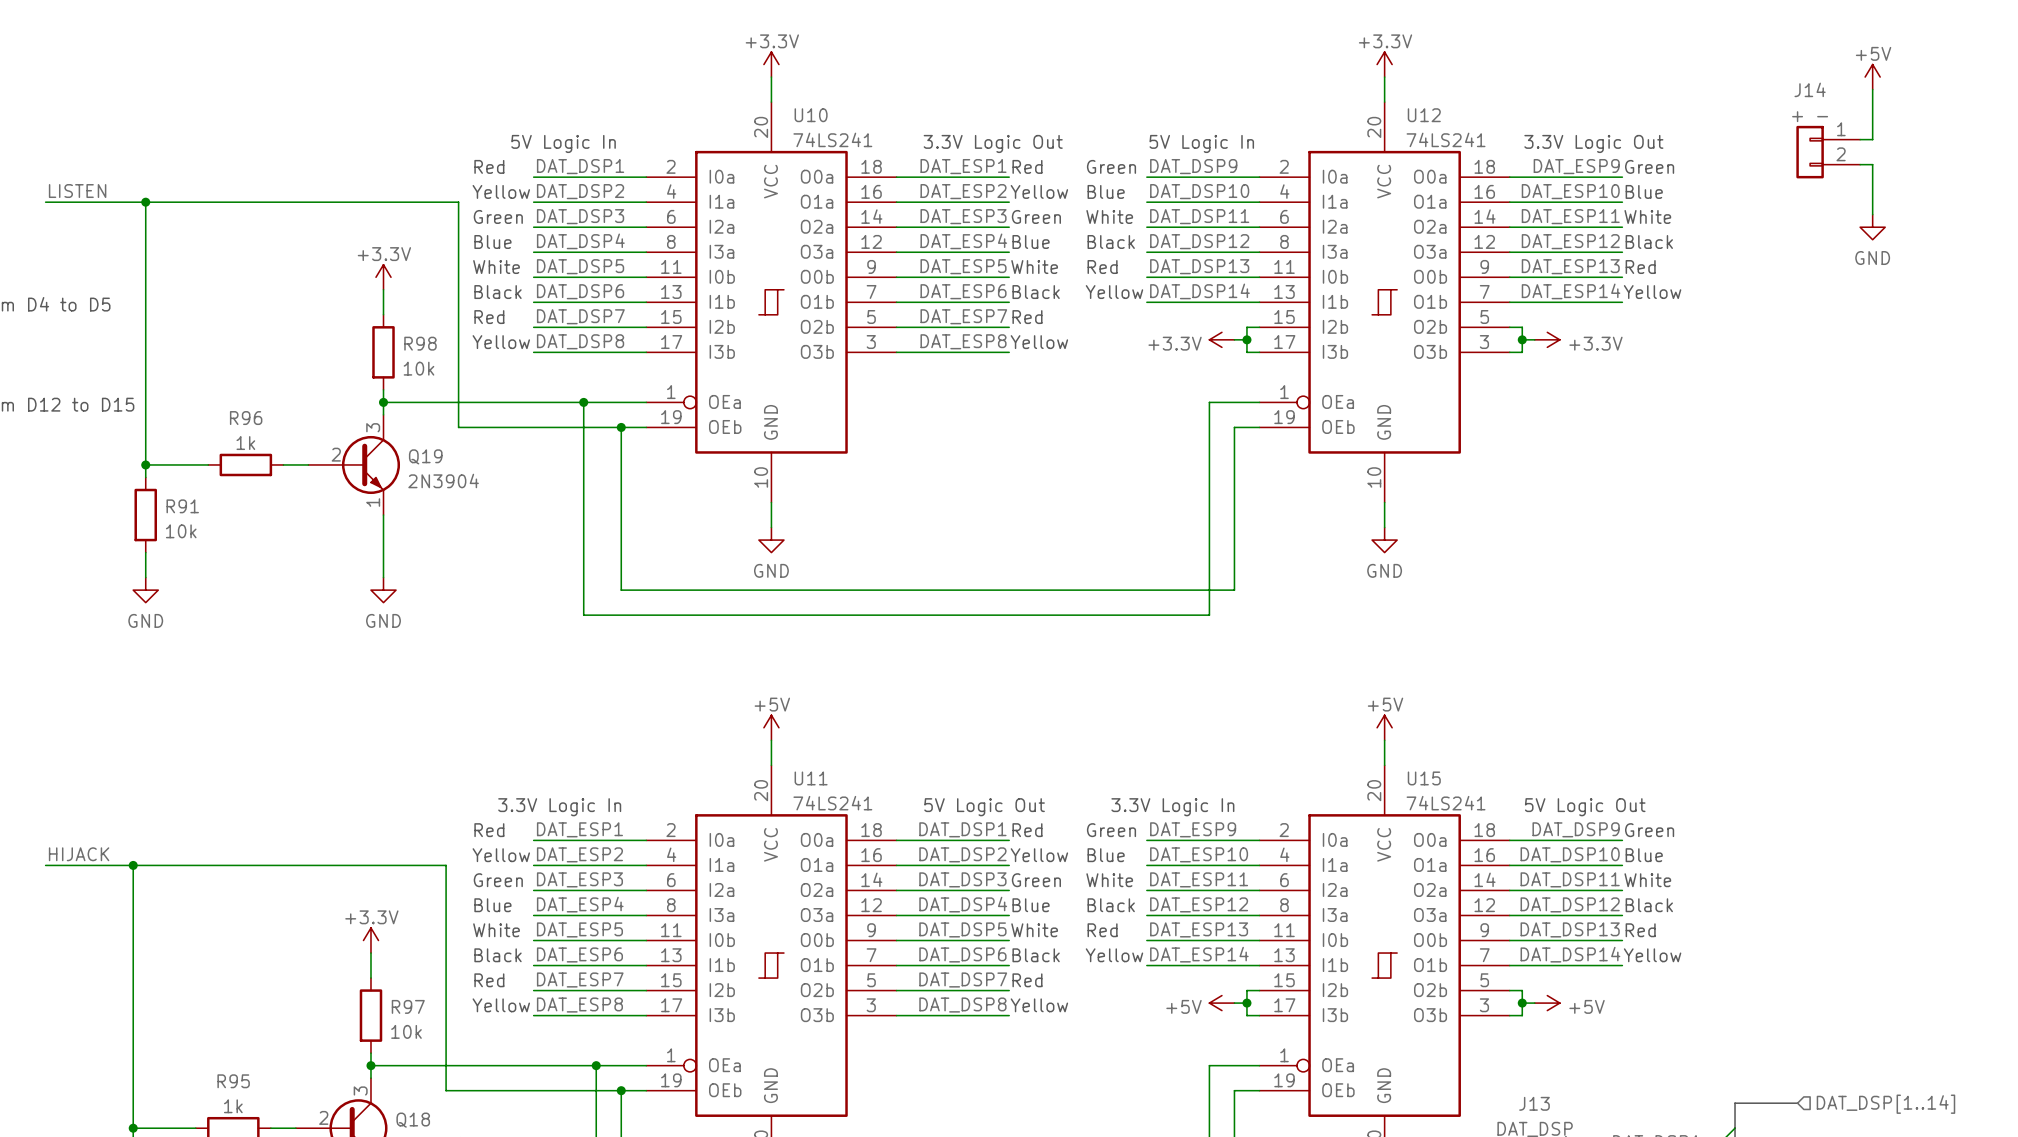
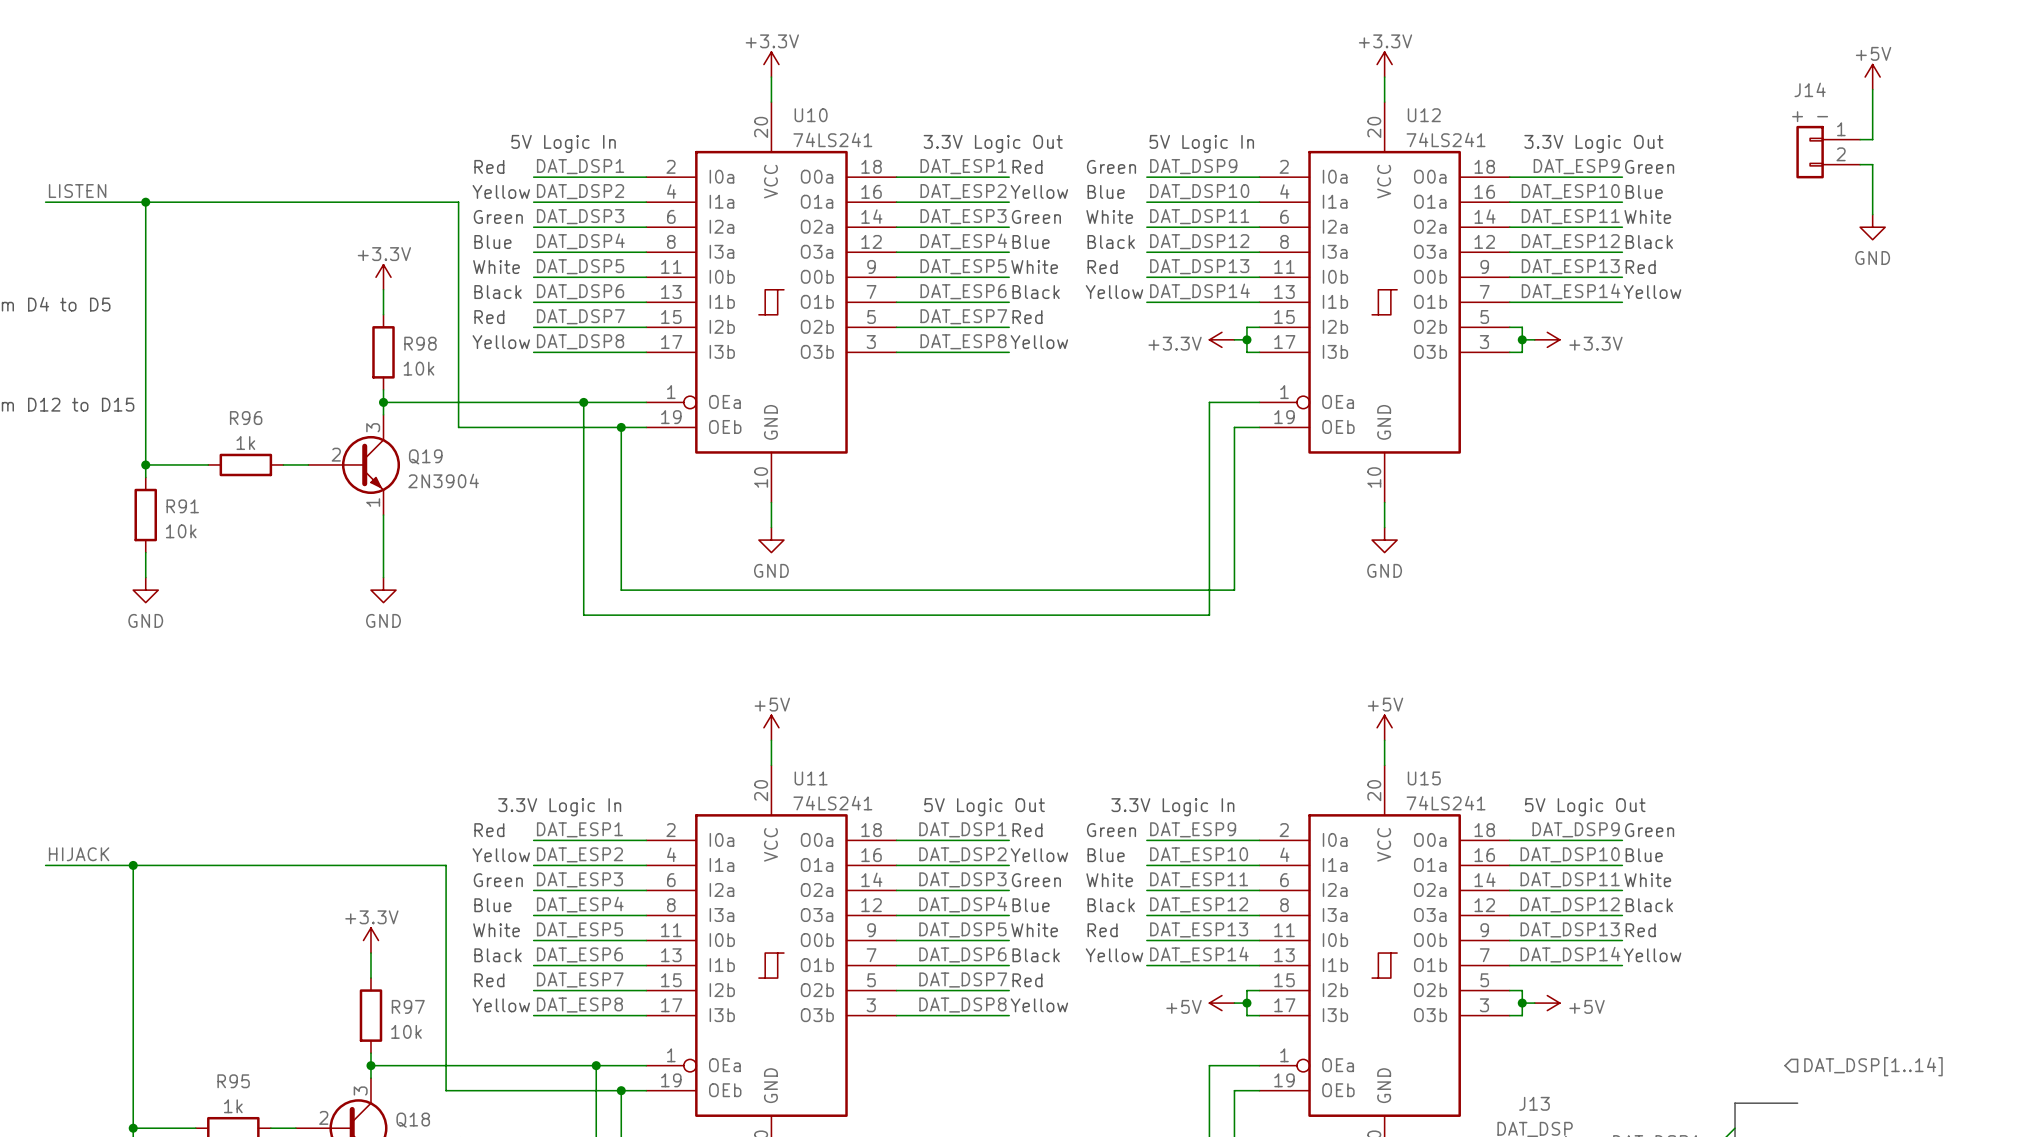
hierarchical label position: DAT_DSP[1..14] (1885, 1104) -> DAT_DSP[1..14] (1873, 1066)

